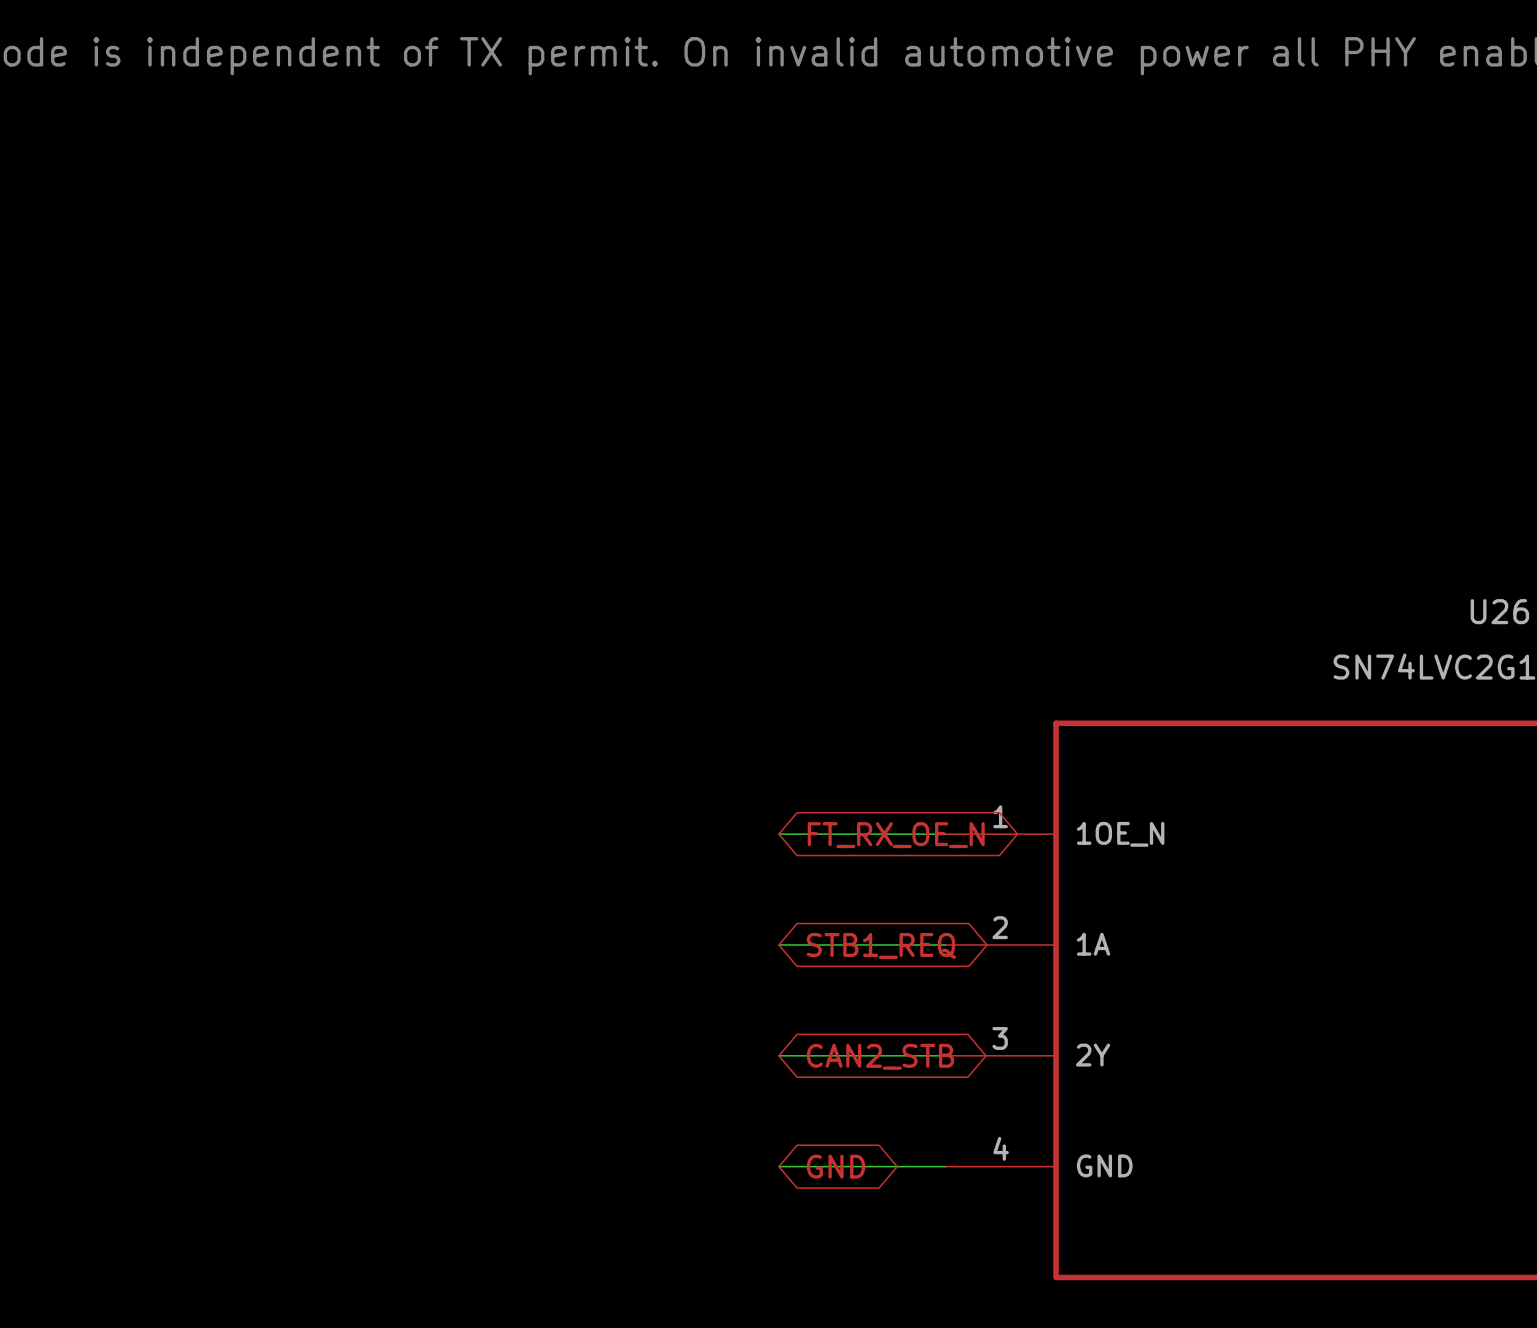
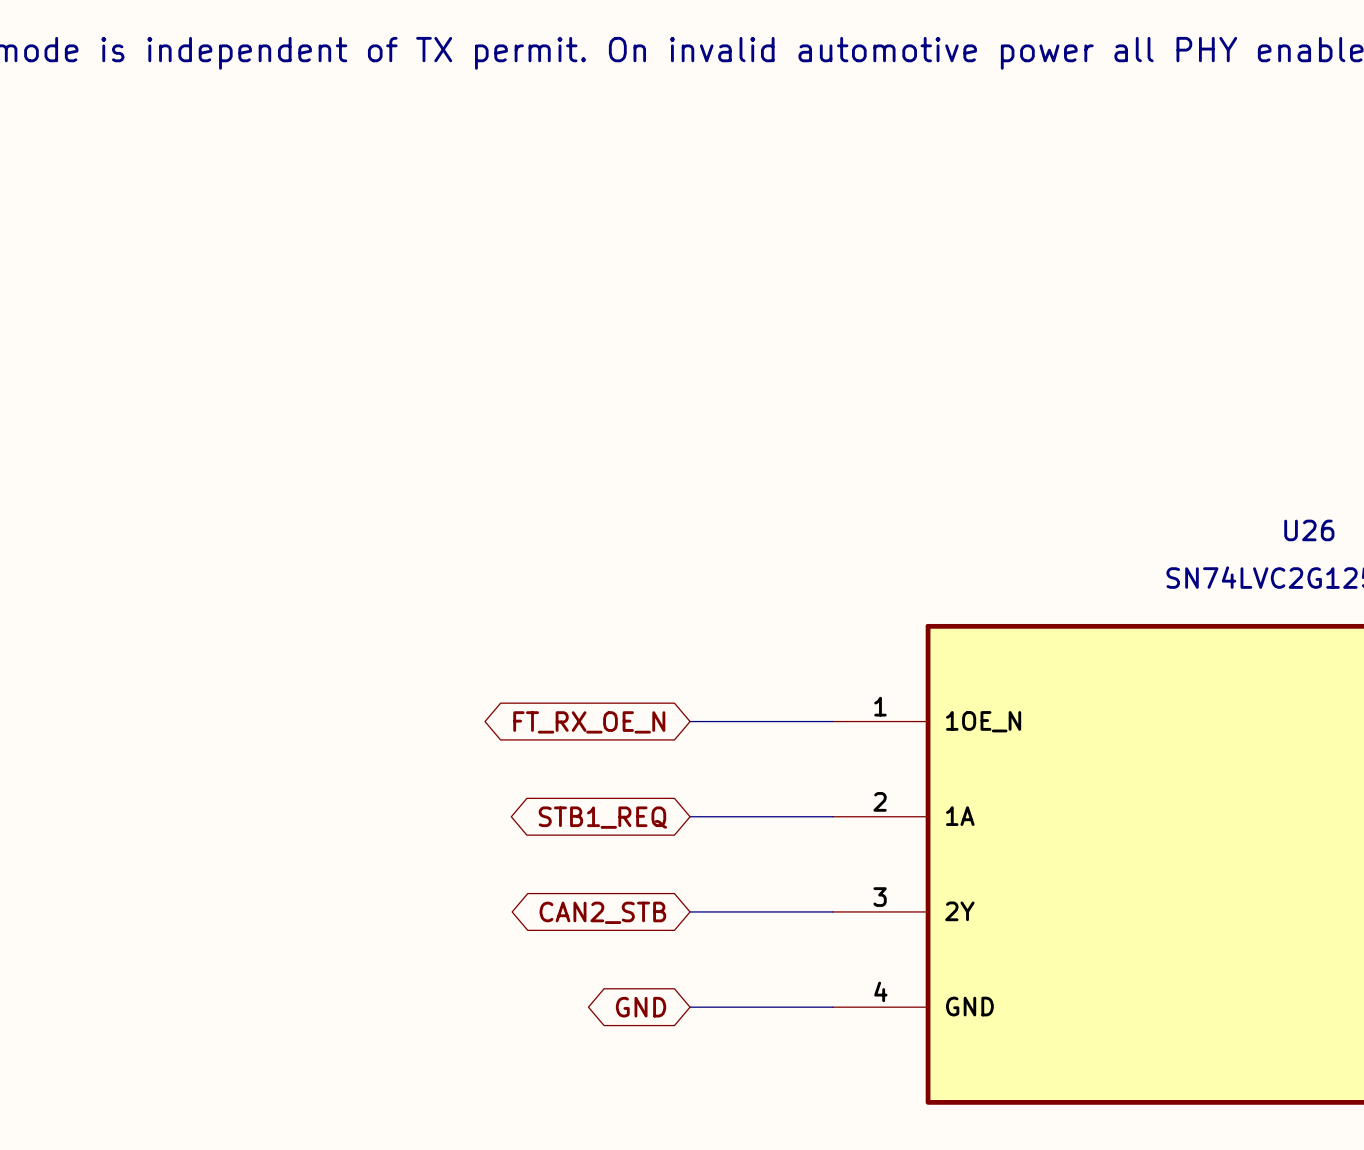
global label rotation: 0° (896, 835) -> 180° (589, 722)
global label rotation: 0° (881, 945) -> 180° (602, 817)
global label position: STB1_REQ (881, 945) -> STB1_REQ (602, 817)
global label rotation: 0° (880, 1056) -> 180° (602, 912)
global label position: CAN2_STB (880, 1056) -> CAN2_STB (602, 912)
global label rotation: 0° (836, 1166) -> 180° (641, 1007)
global label position: GND (836, 1166) -> GND (641, 1007)

